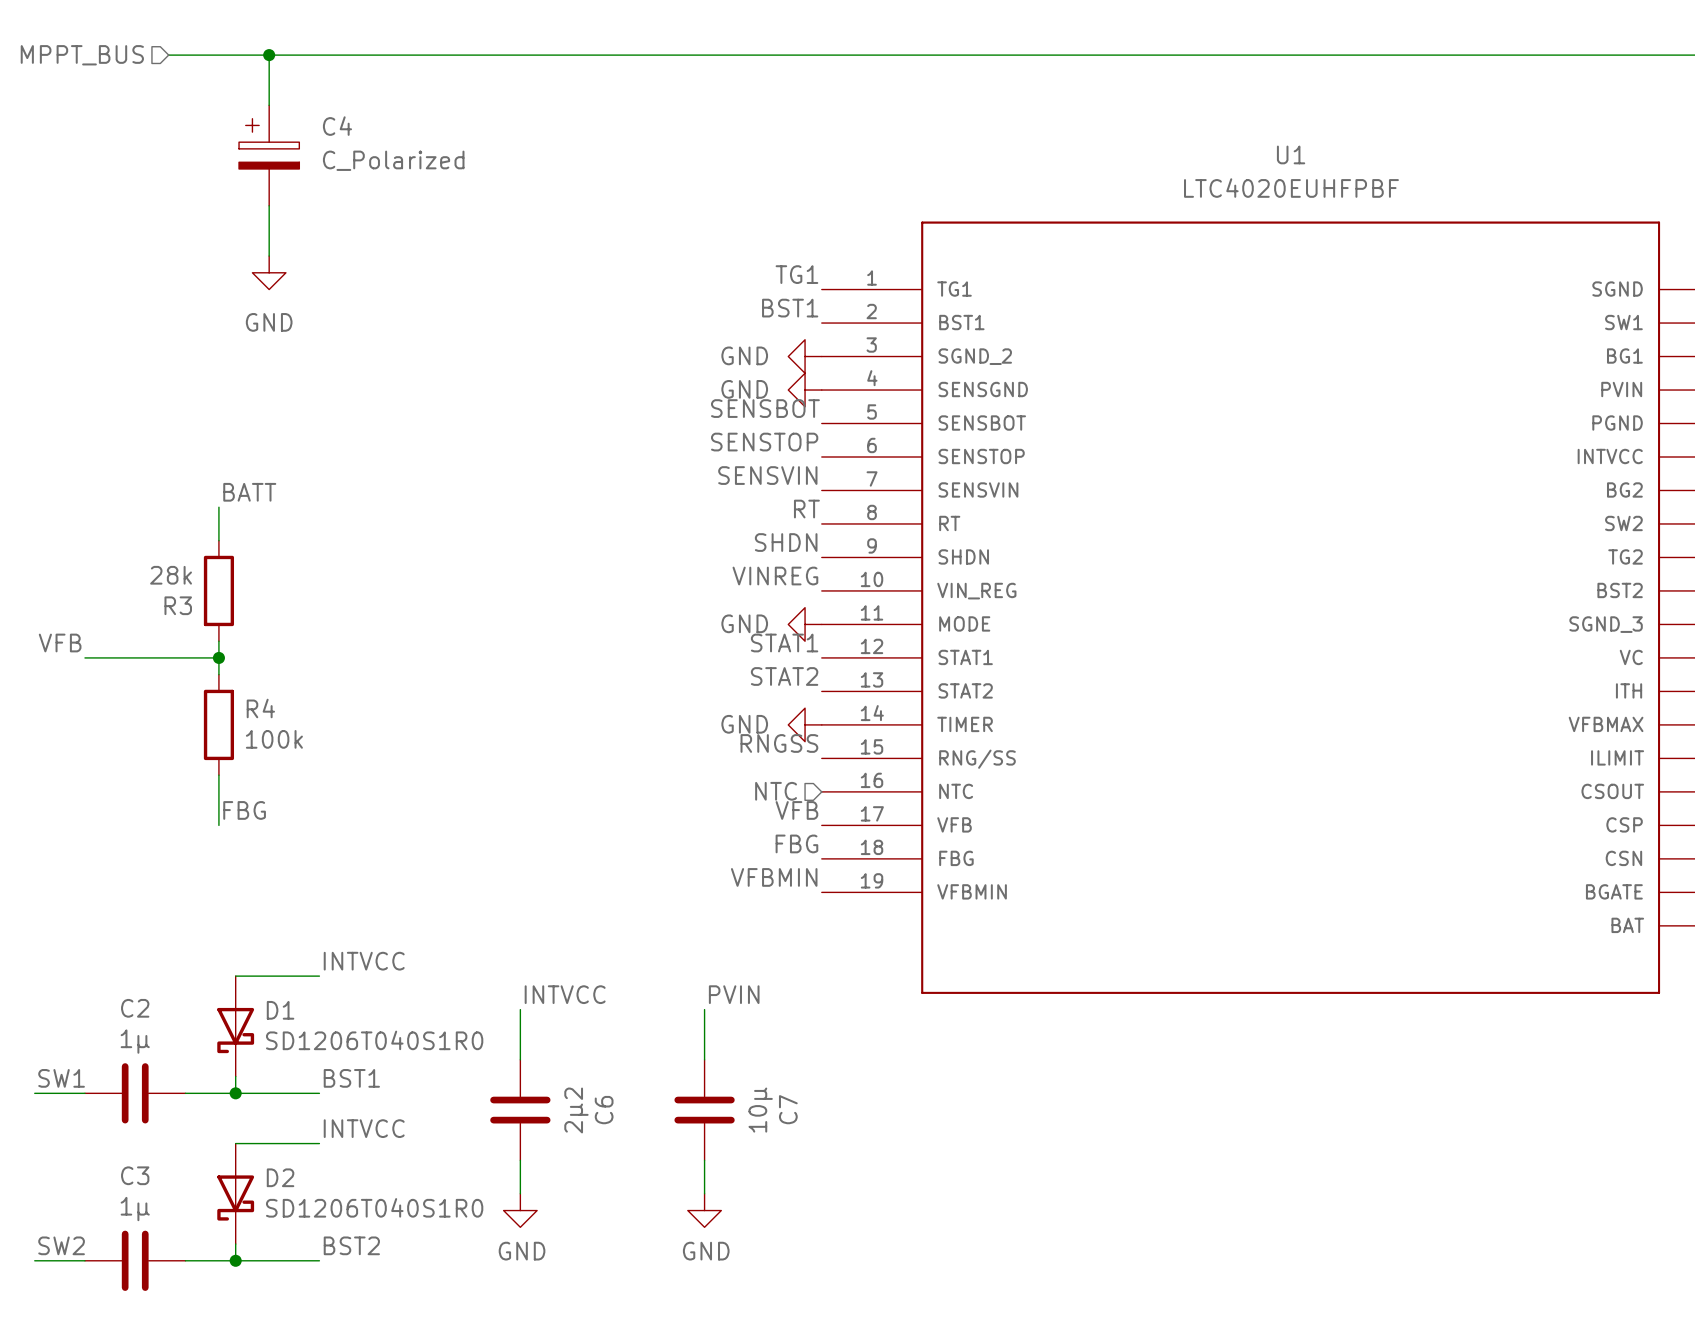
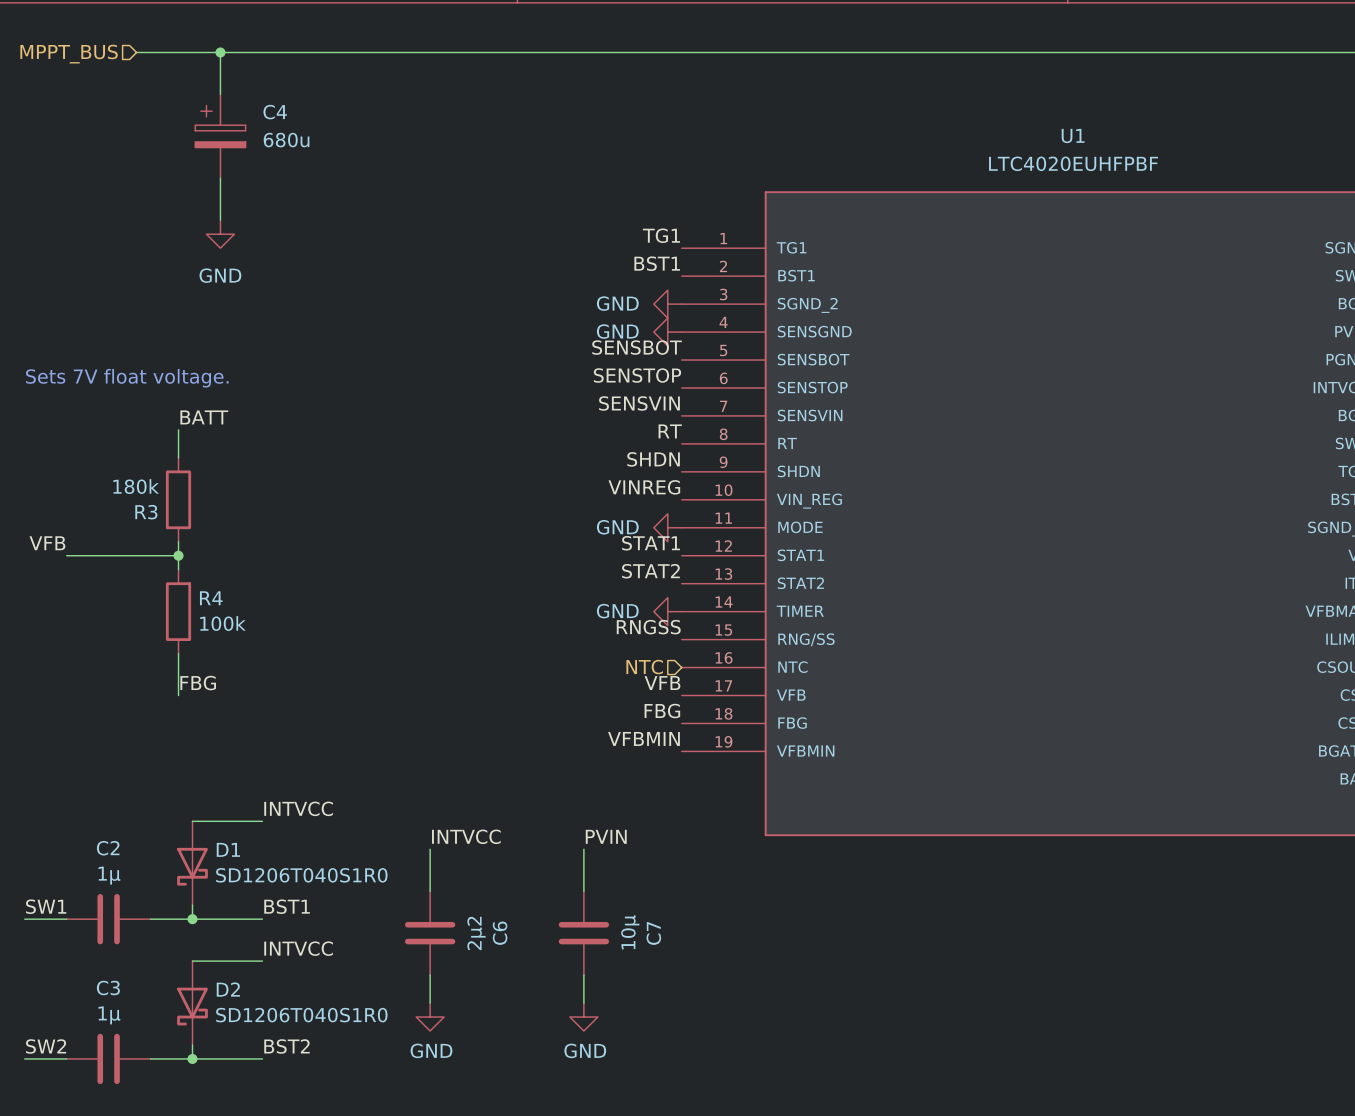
C4 value: C_Polarized (393, 160) -> 680u (286, 140)
text: none -> Sets 7V float voltage. (127, 378)
R3 value: 28k (171, 575) -> 180k (136, 486)

